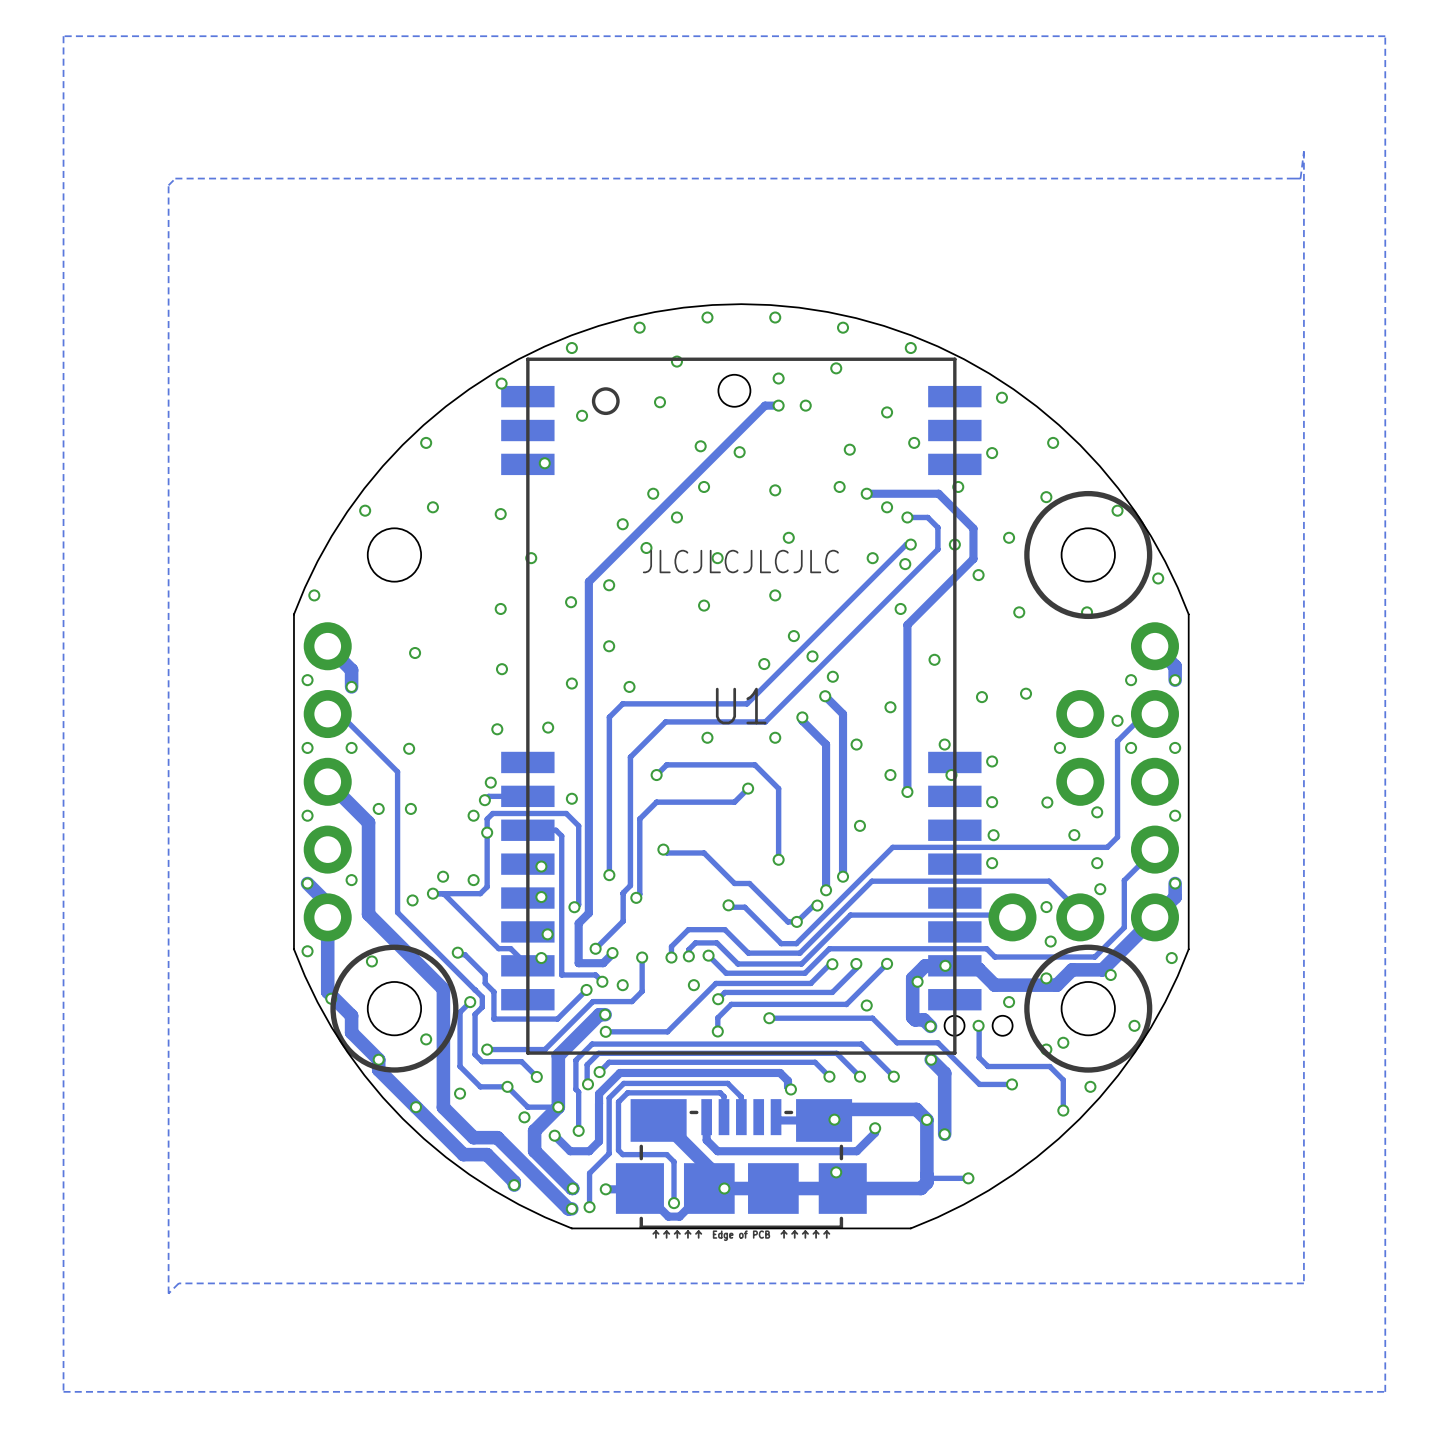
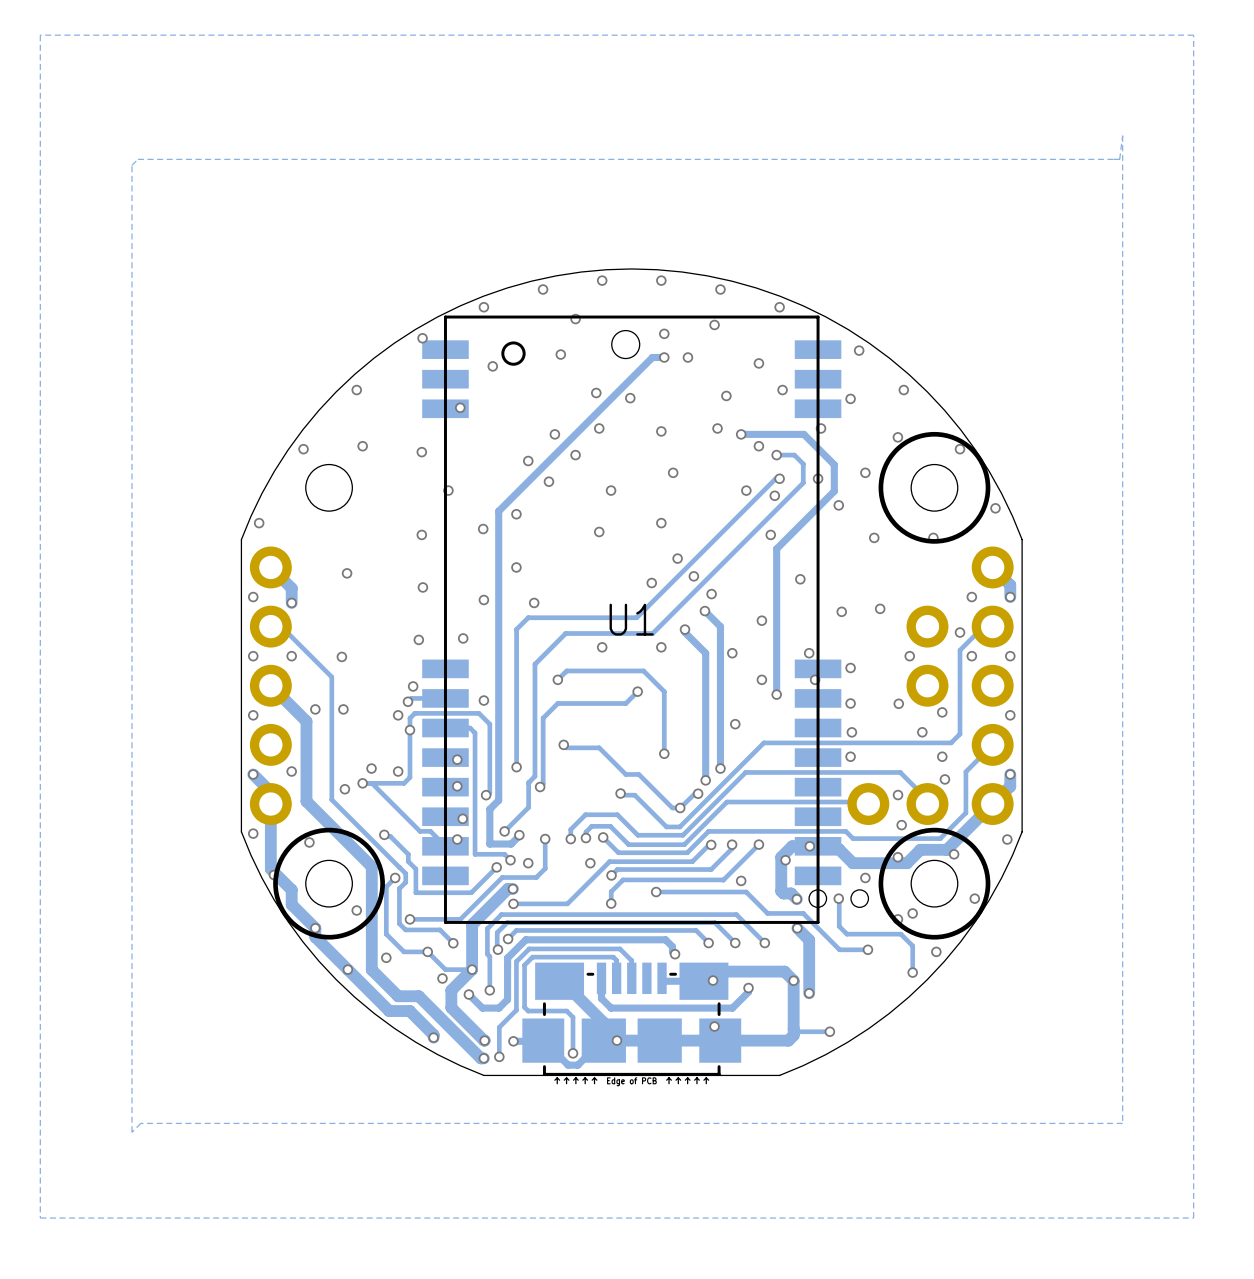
text: JLCJLCJLCJLC (740, 561) -> none

